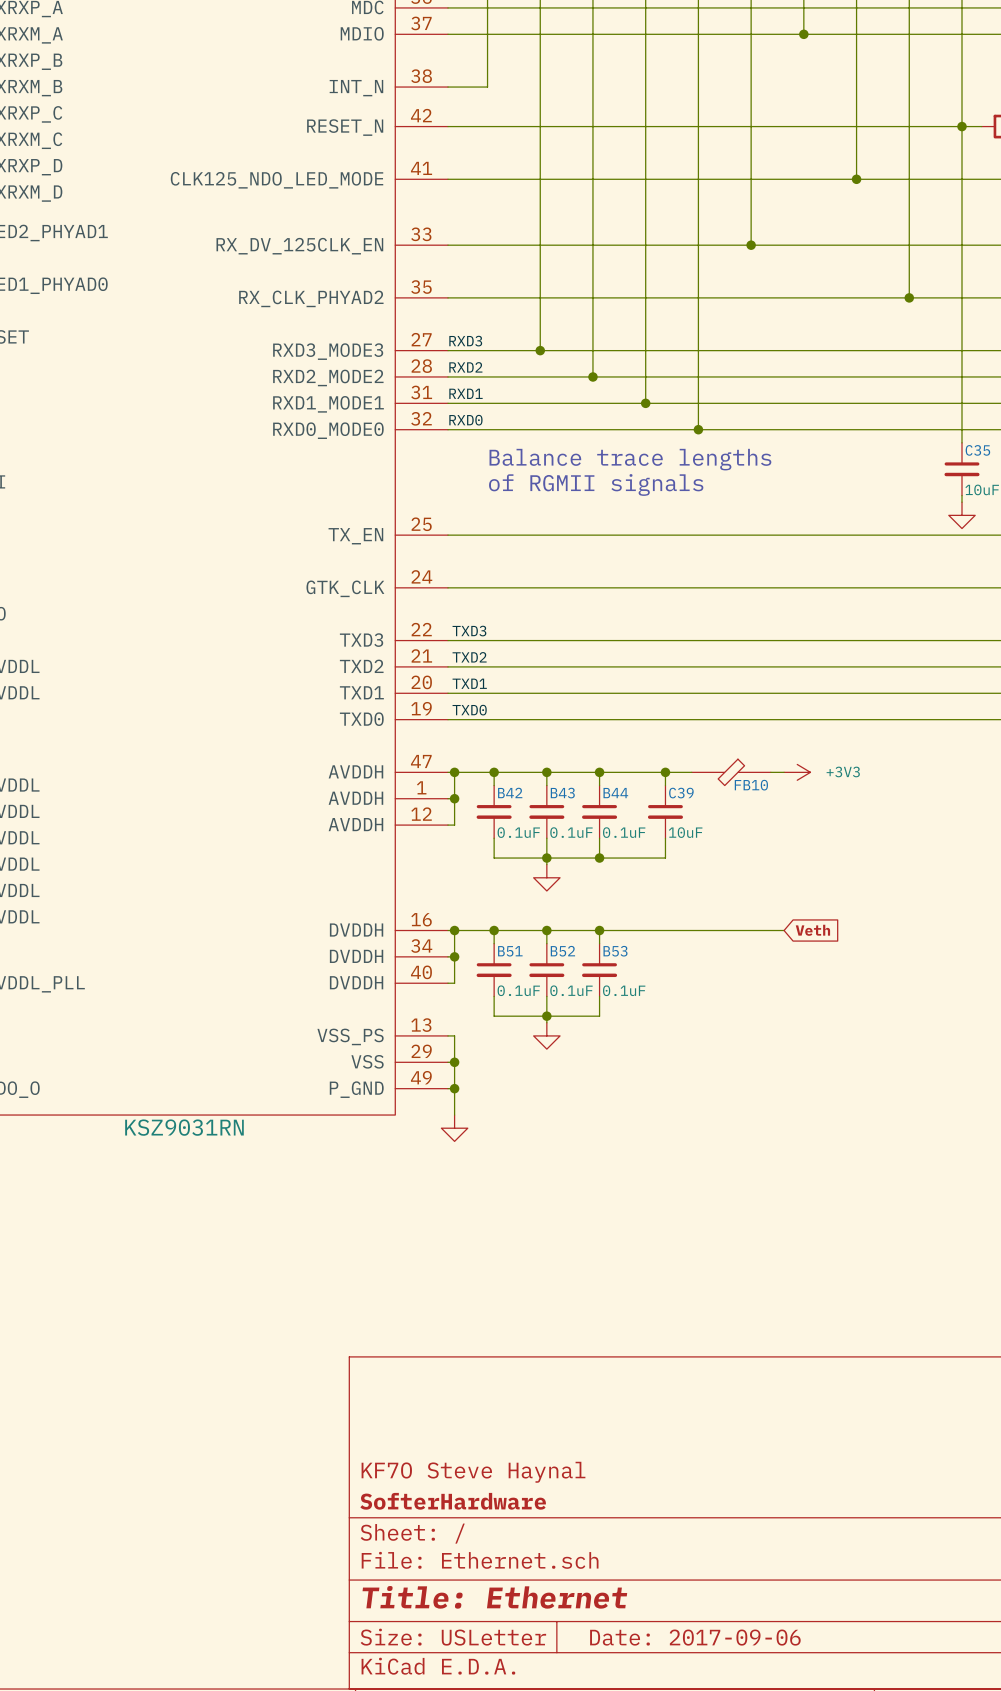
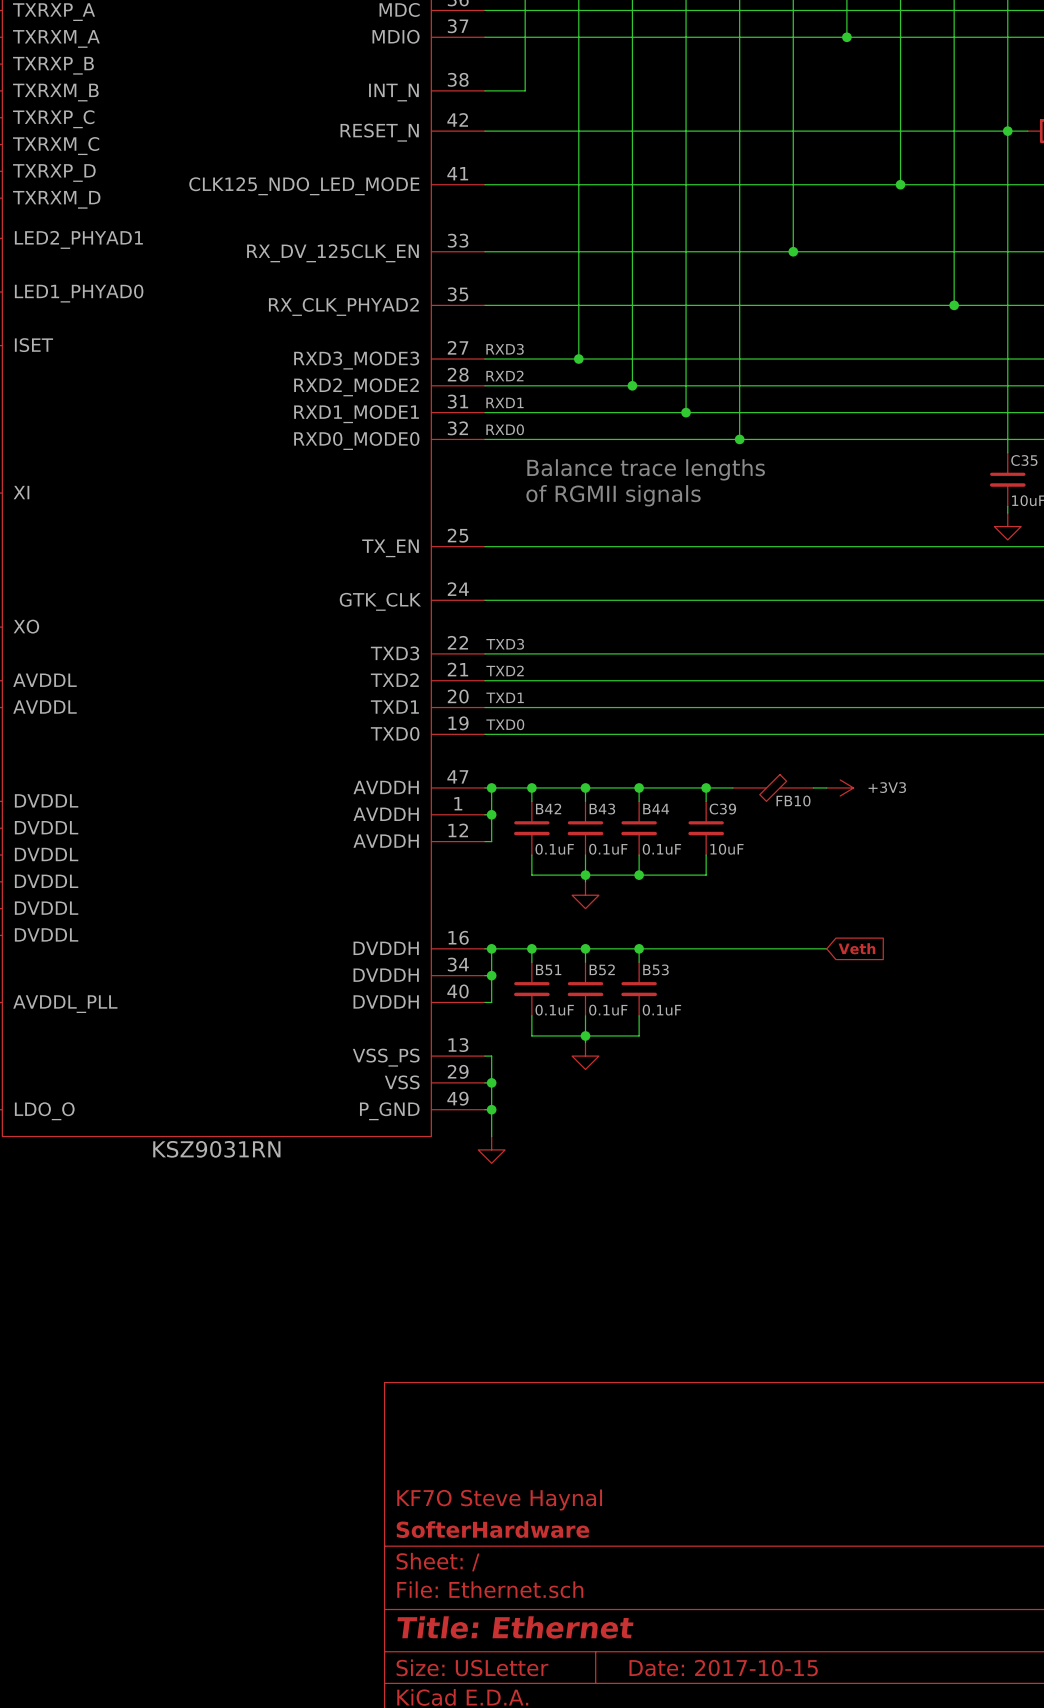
title block: Date: 2017-09-06 (695, 1637) -> Date: 2017-10-15 (723, 1668)

